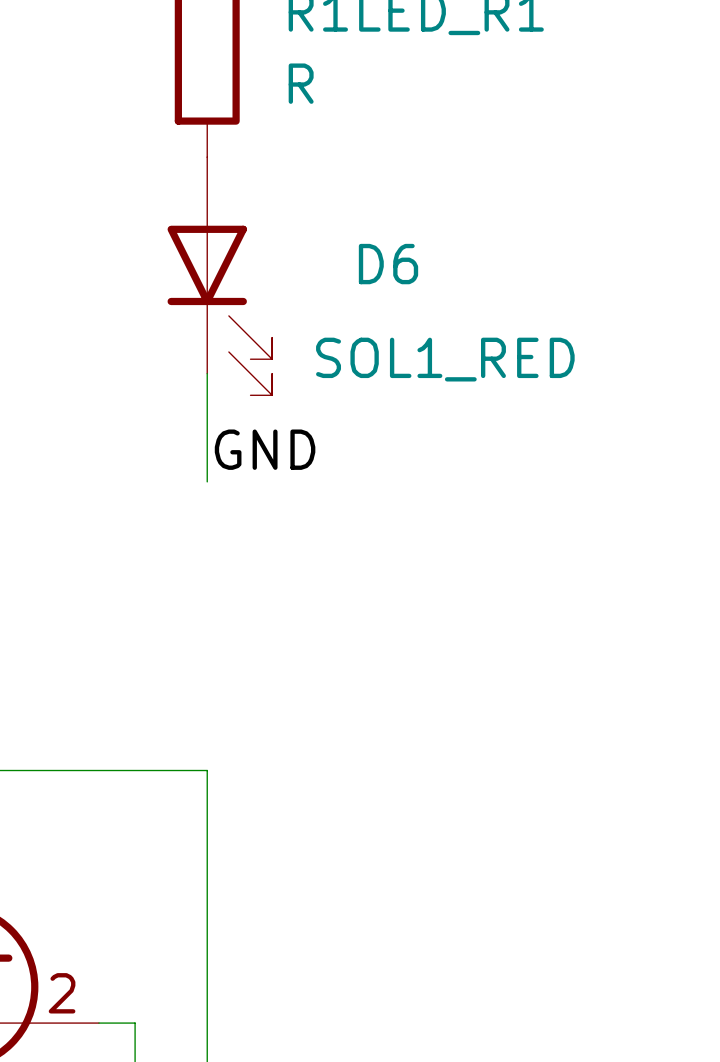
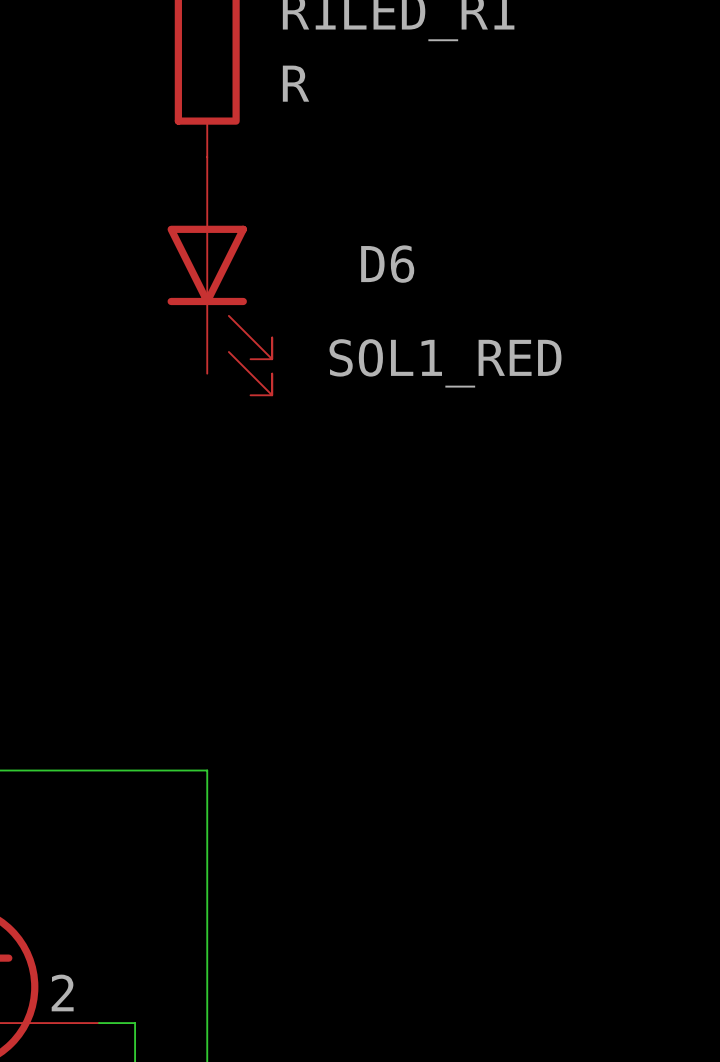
wire: (207, 373) (207, 481) -> none
label: GND (265, 449) -> none

